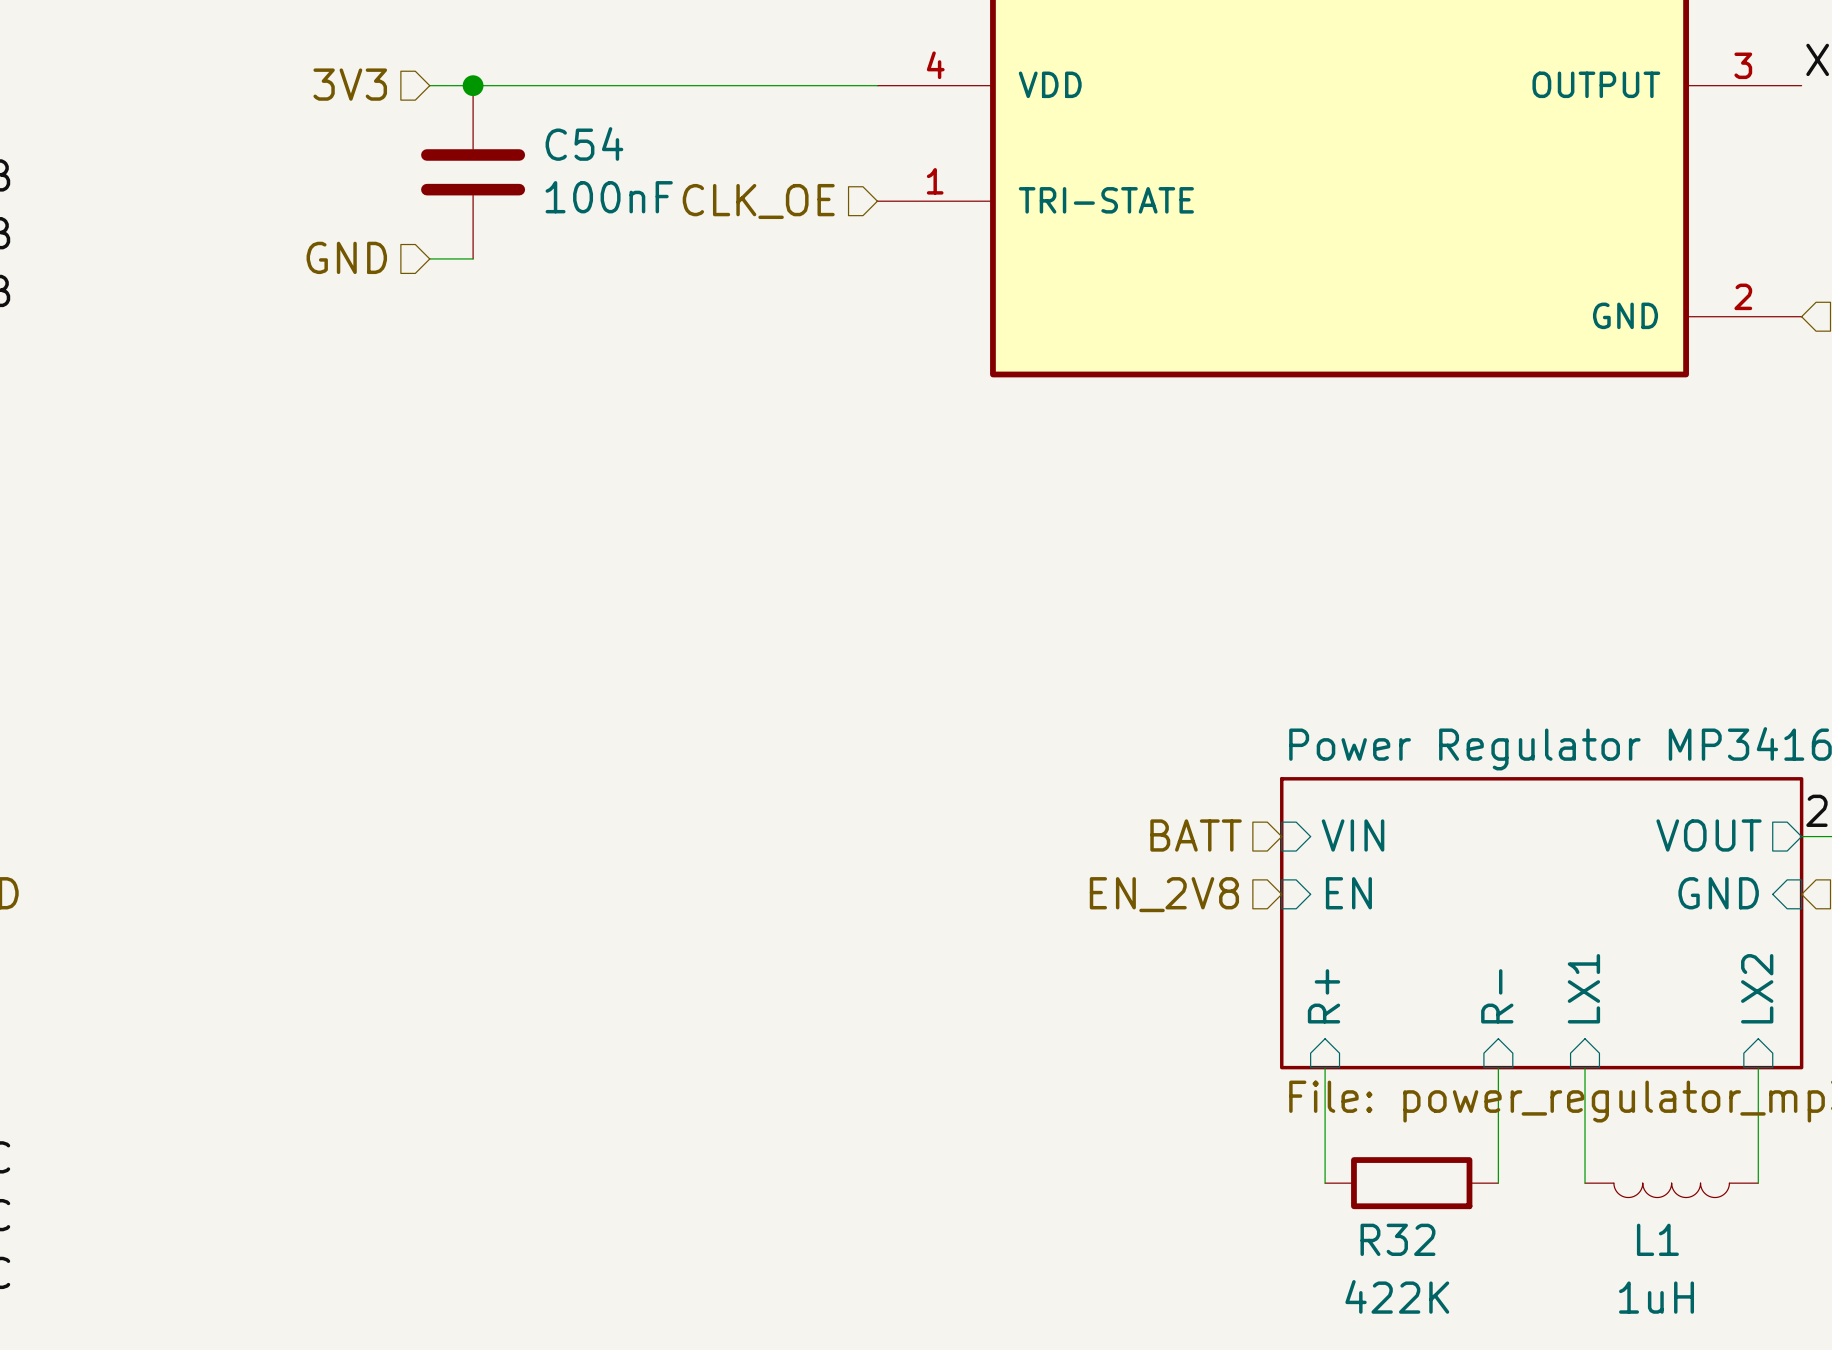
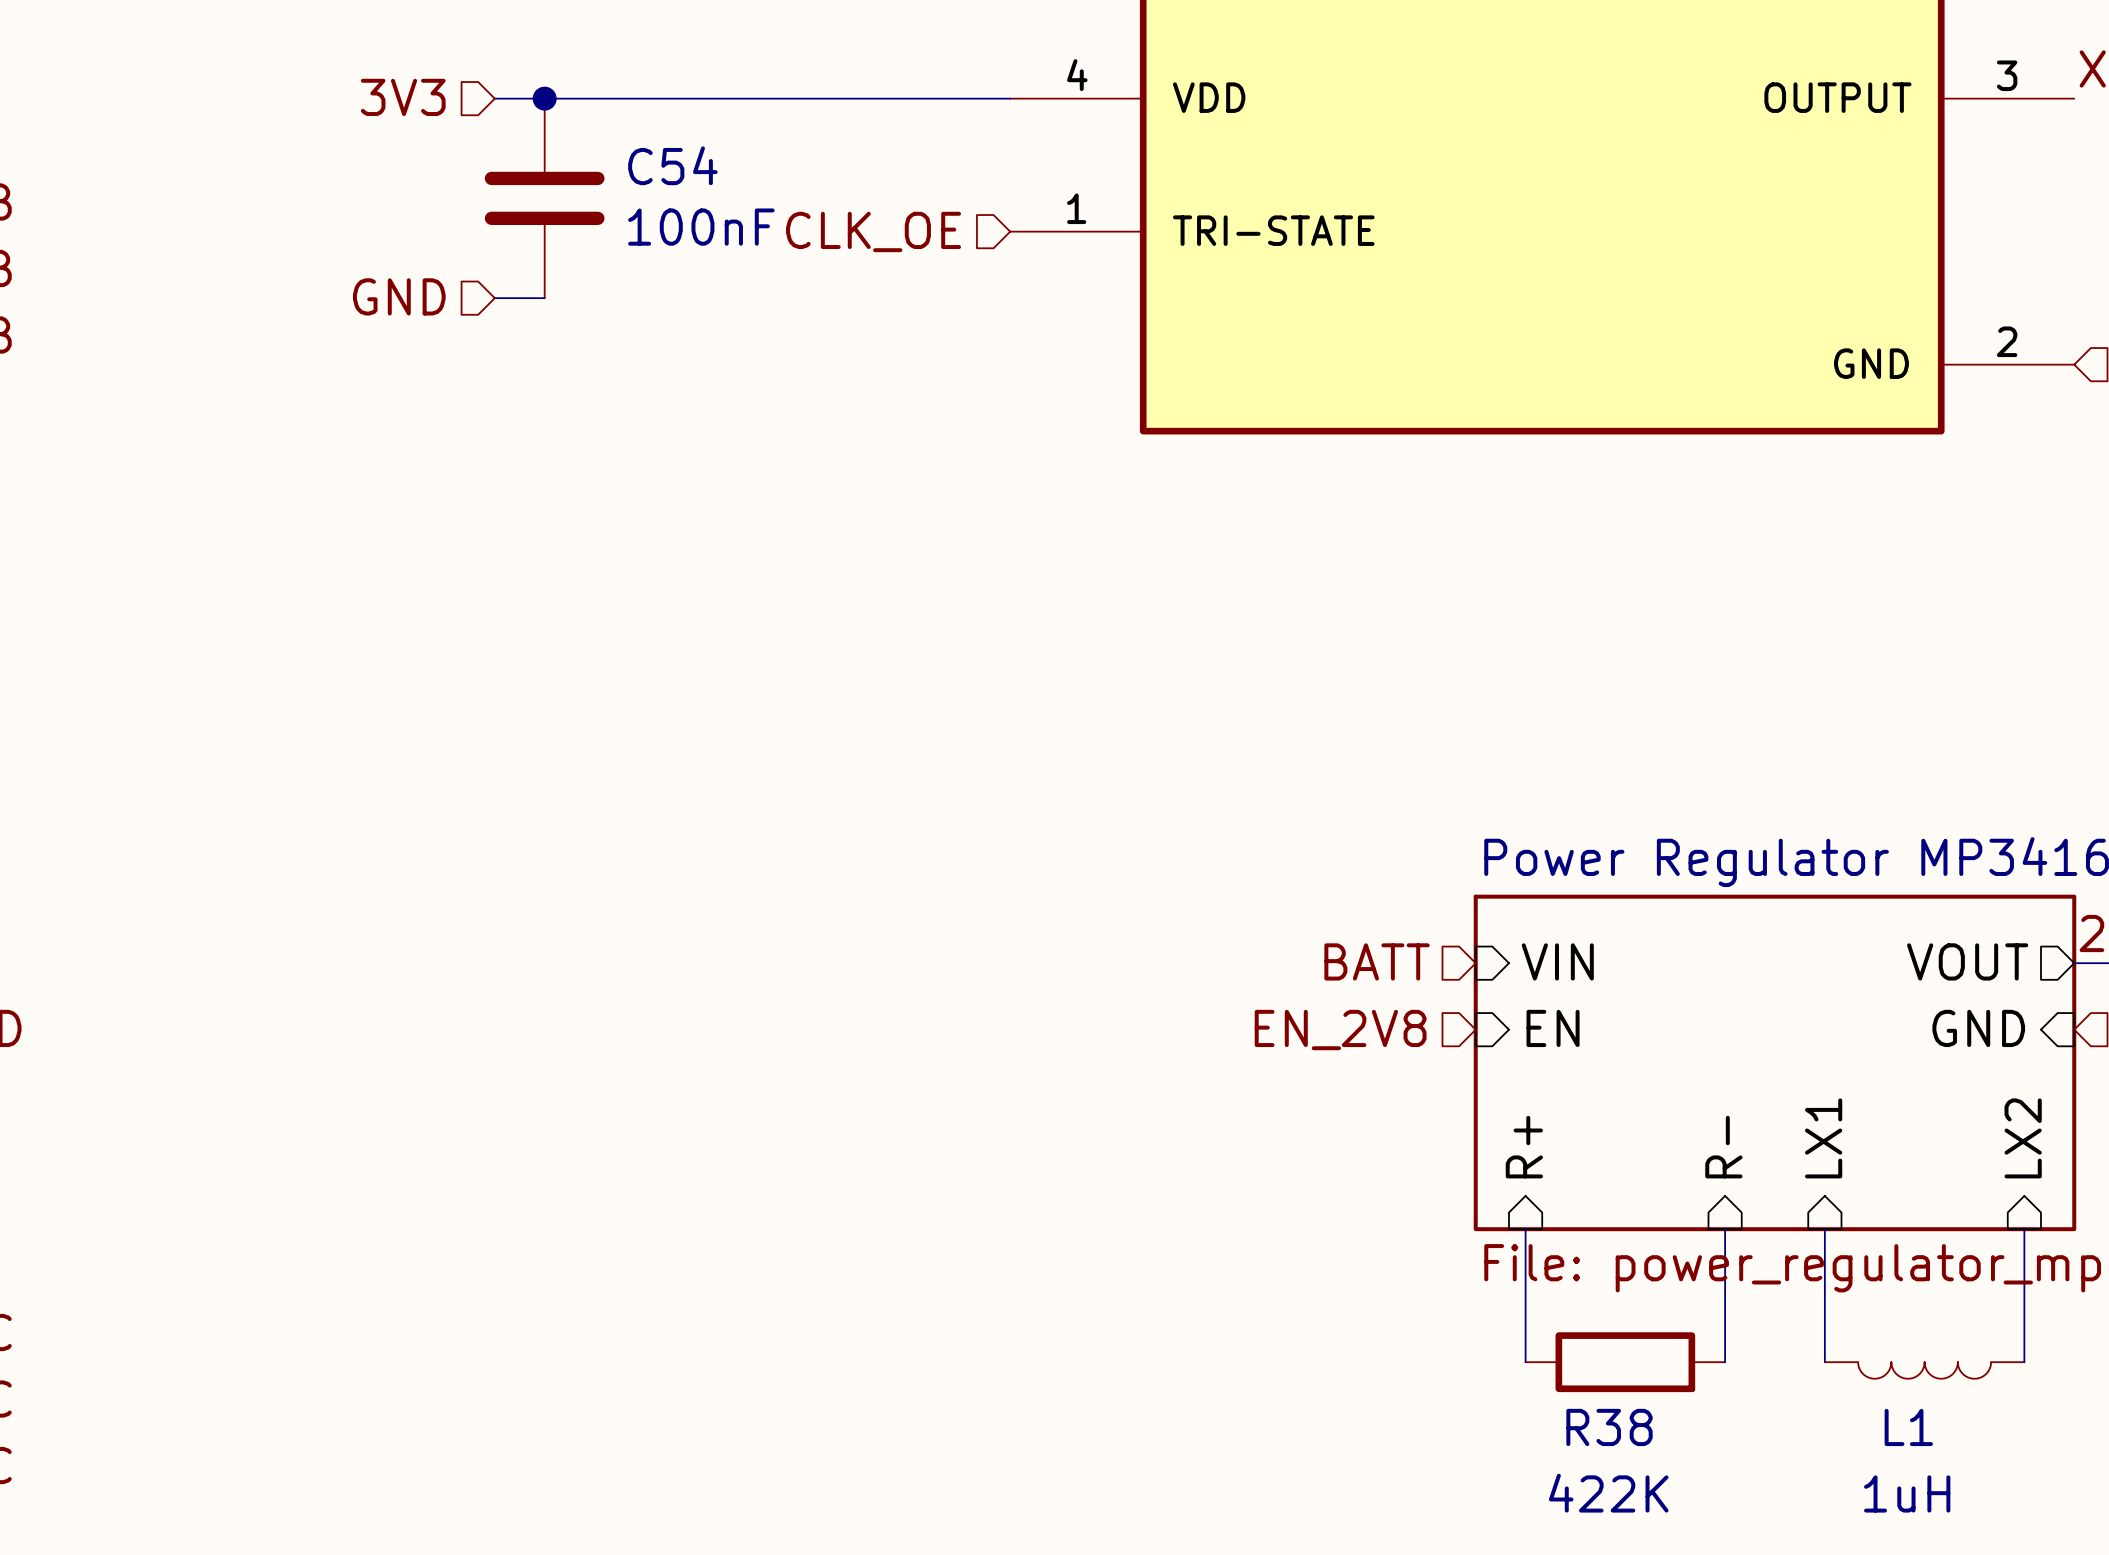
R32 name: R32 (1397, 1239) -> R38 (1609, 1427)

